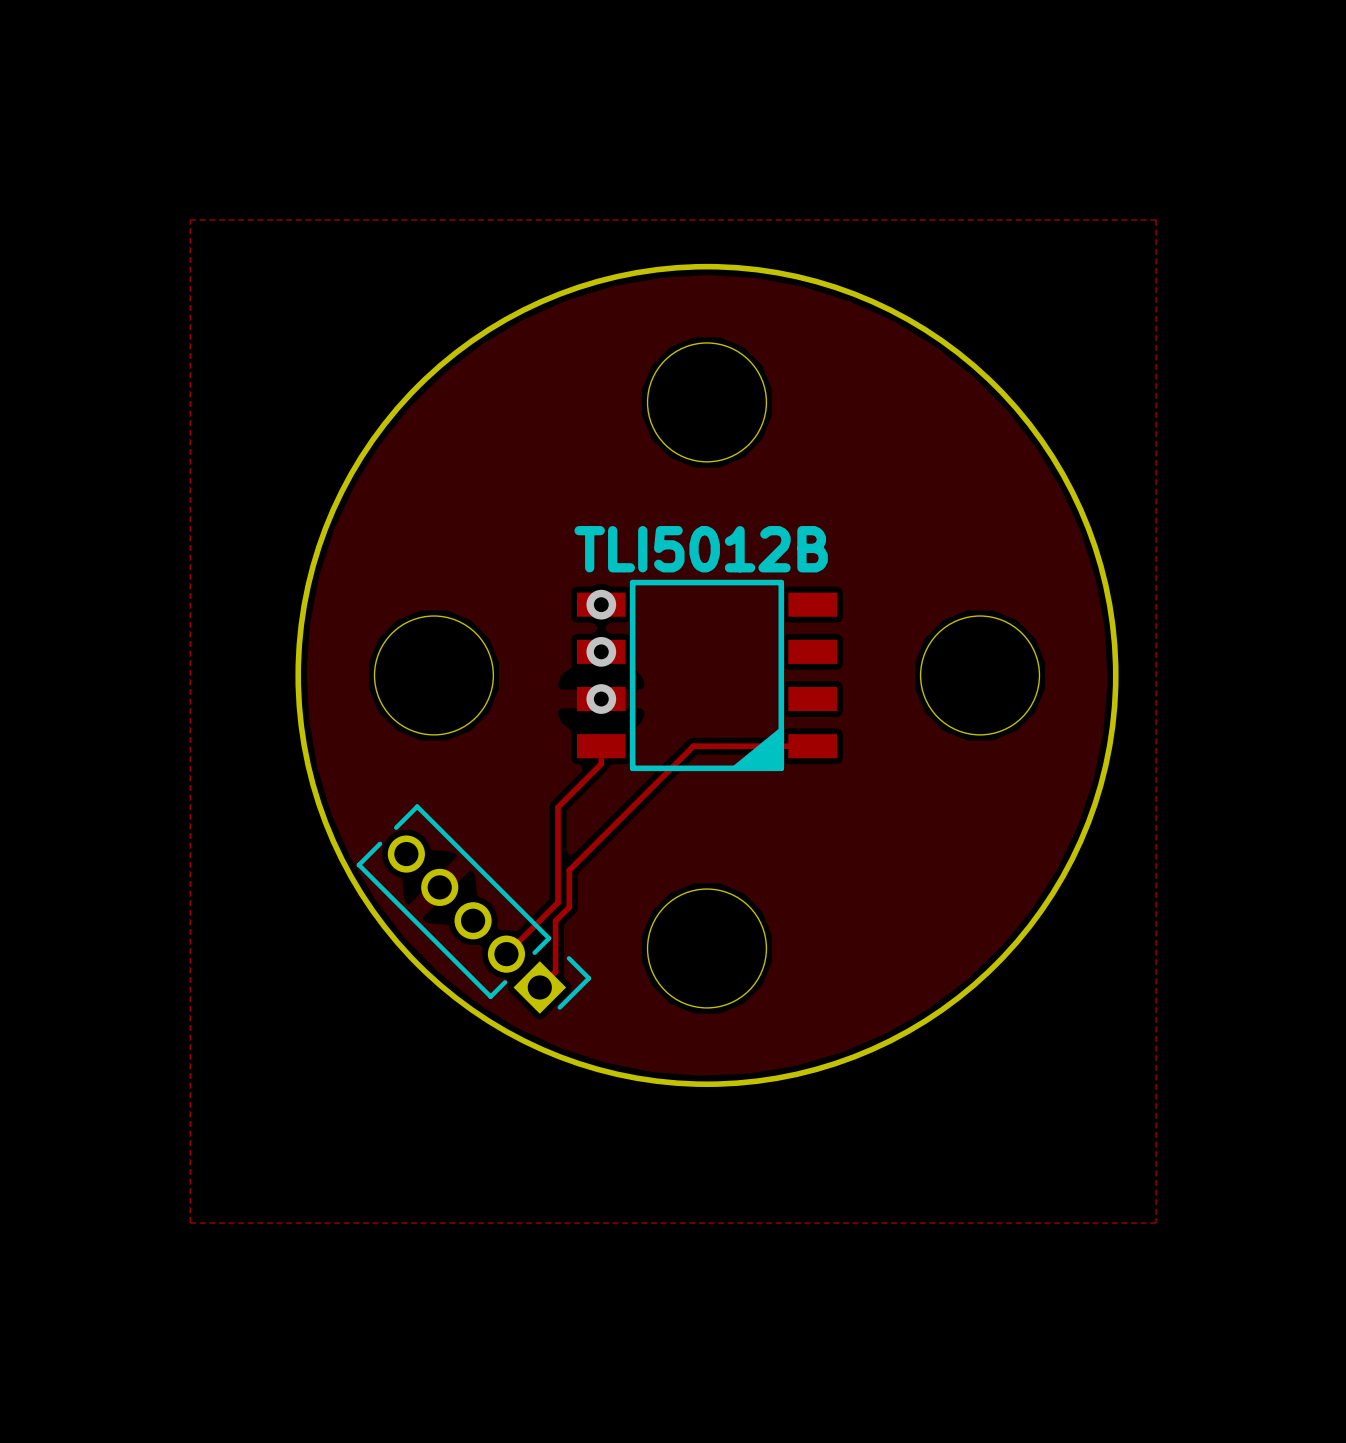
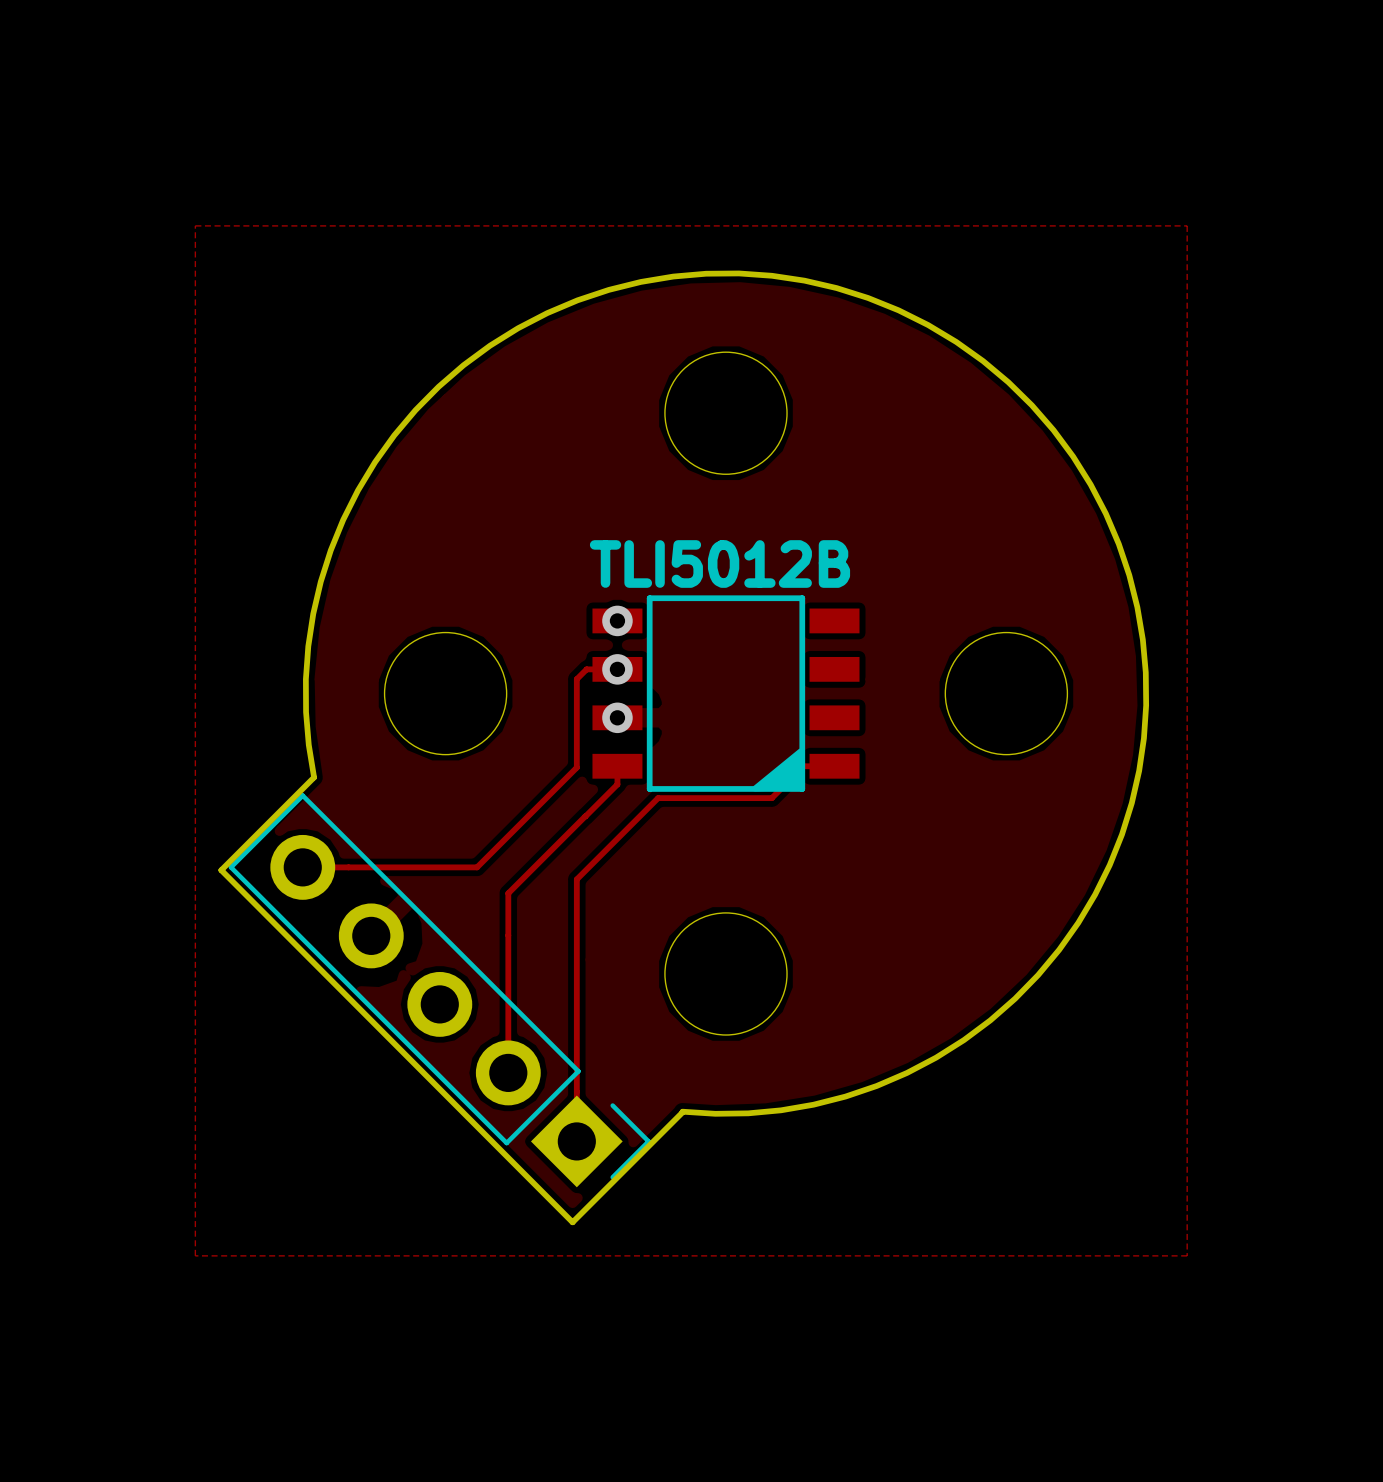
round board edge: [295, 263, 1119, 1088] -> none
track: none -> (617, 669) (586, 669) (576, 679) (576, 767) (477, 867) (302, 867)
track: (782, 746) (693, 746) (569, 870) (569, 907) (555, 921) (555, 971) (539, 987) -> (803, 766) (771, 798) (658, 798) (576, 879) (576, 1141)
board edge: none -> (313, 777) (221, 870) (572, 1222) (682, 1112)
board edge: none -> (314, 777) (306, 712) (308, 646) (320, 581) (343, 519) (375, 462) (415, 410) (463, 365) (518, 328) (577, 300) (640, 281) (706, 273) (771, 275) (836, 288) (898, 310) (956, 341) (1008, 382) (1053, 430) (1090, 484) (1118, 544) (1137, 607) (1145, 672) (1143, 738) (1131, 803) (1109, 865) (1078, 922) (1038, 975) (990, 1020) (936, 1057) (876, 1085) (813, 1104) (748, 1113) (682, 1111)
track: (570, 795) (558, 807) (558, 902) (506, 954) -> (585, 816) (508, 893) (508, 1072)
part: (473, 909) -> none
part: none -> (439, 990)

